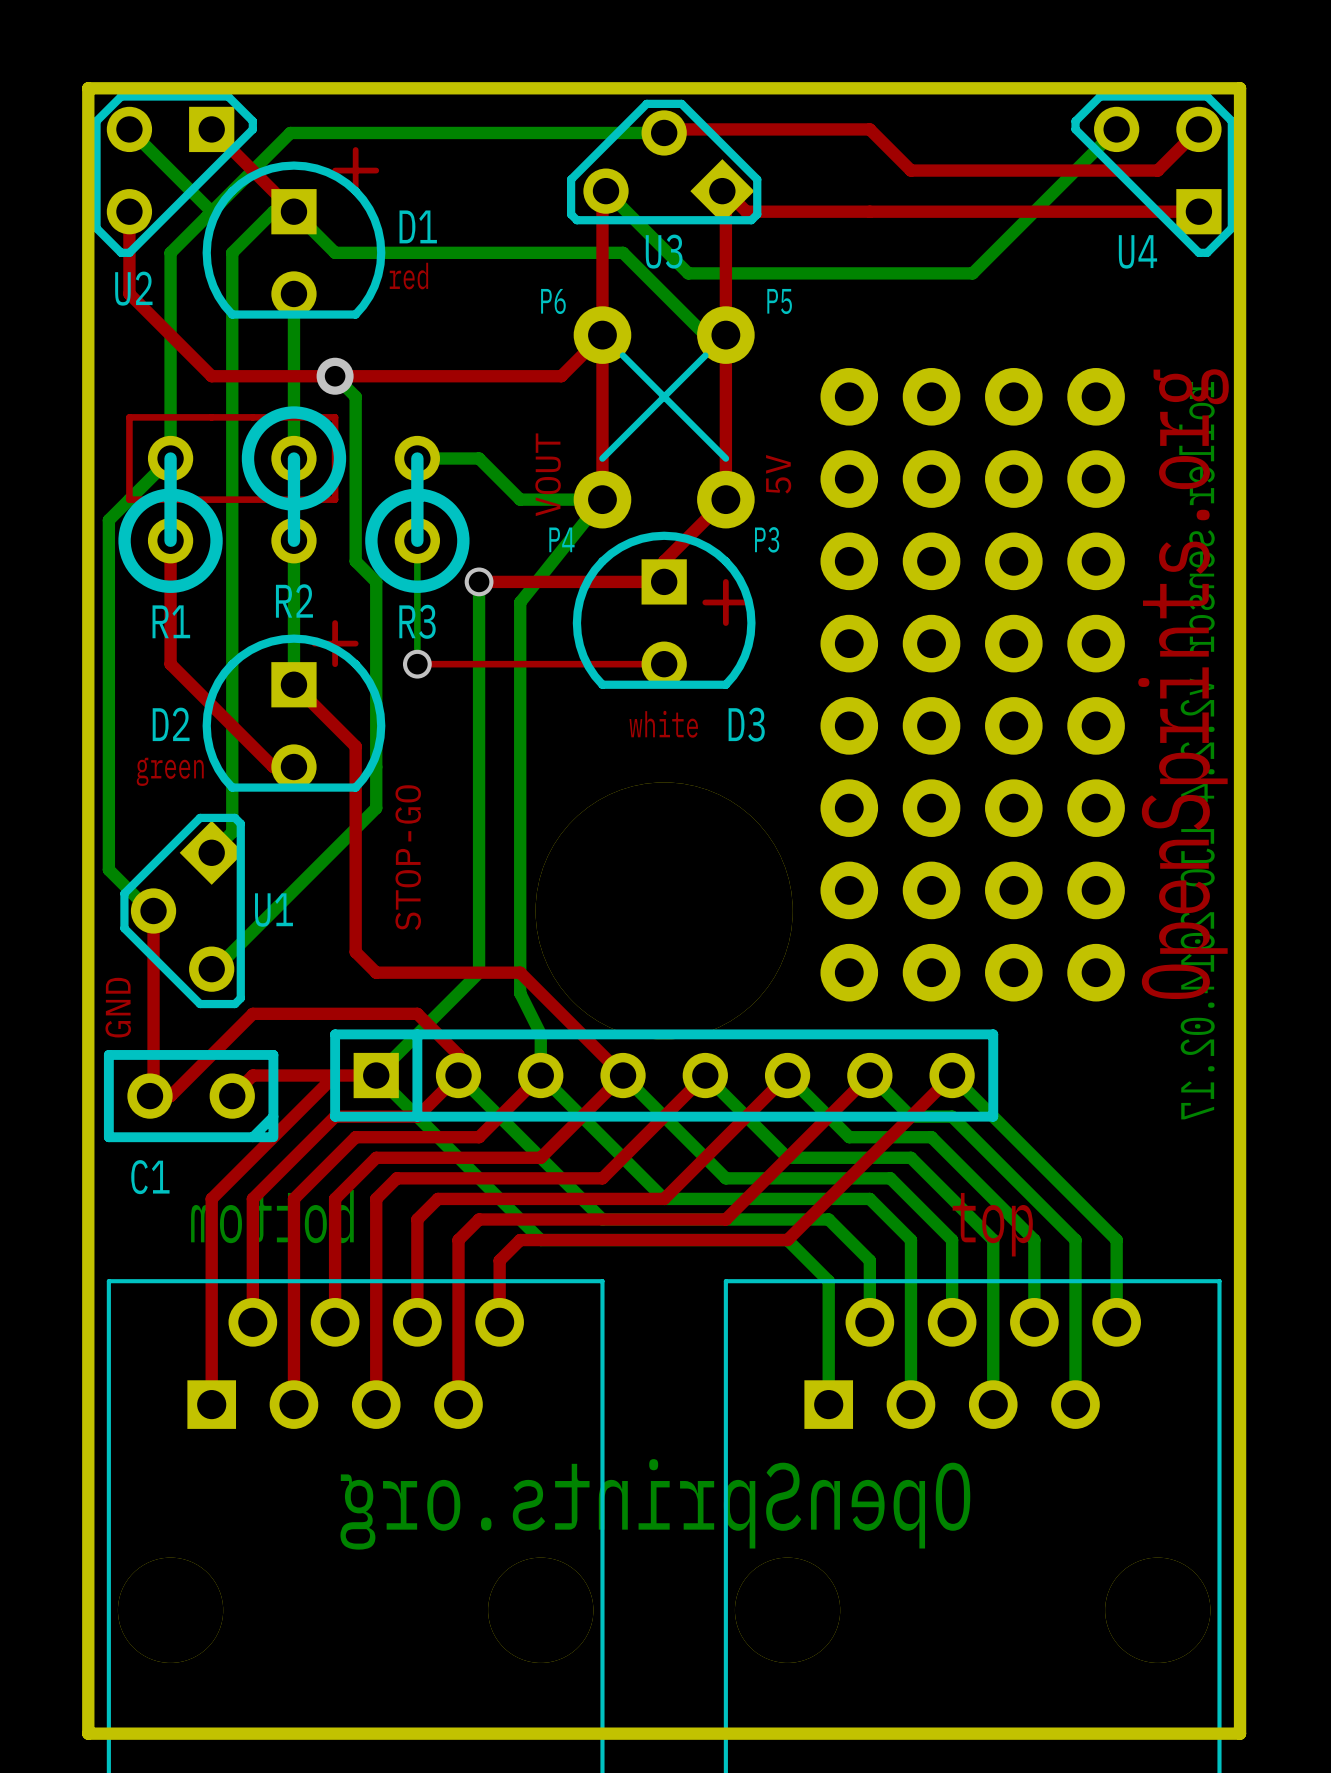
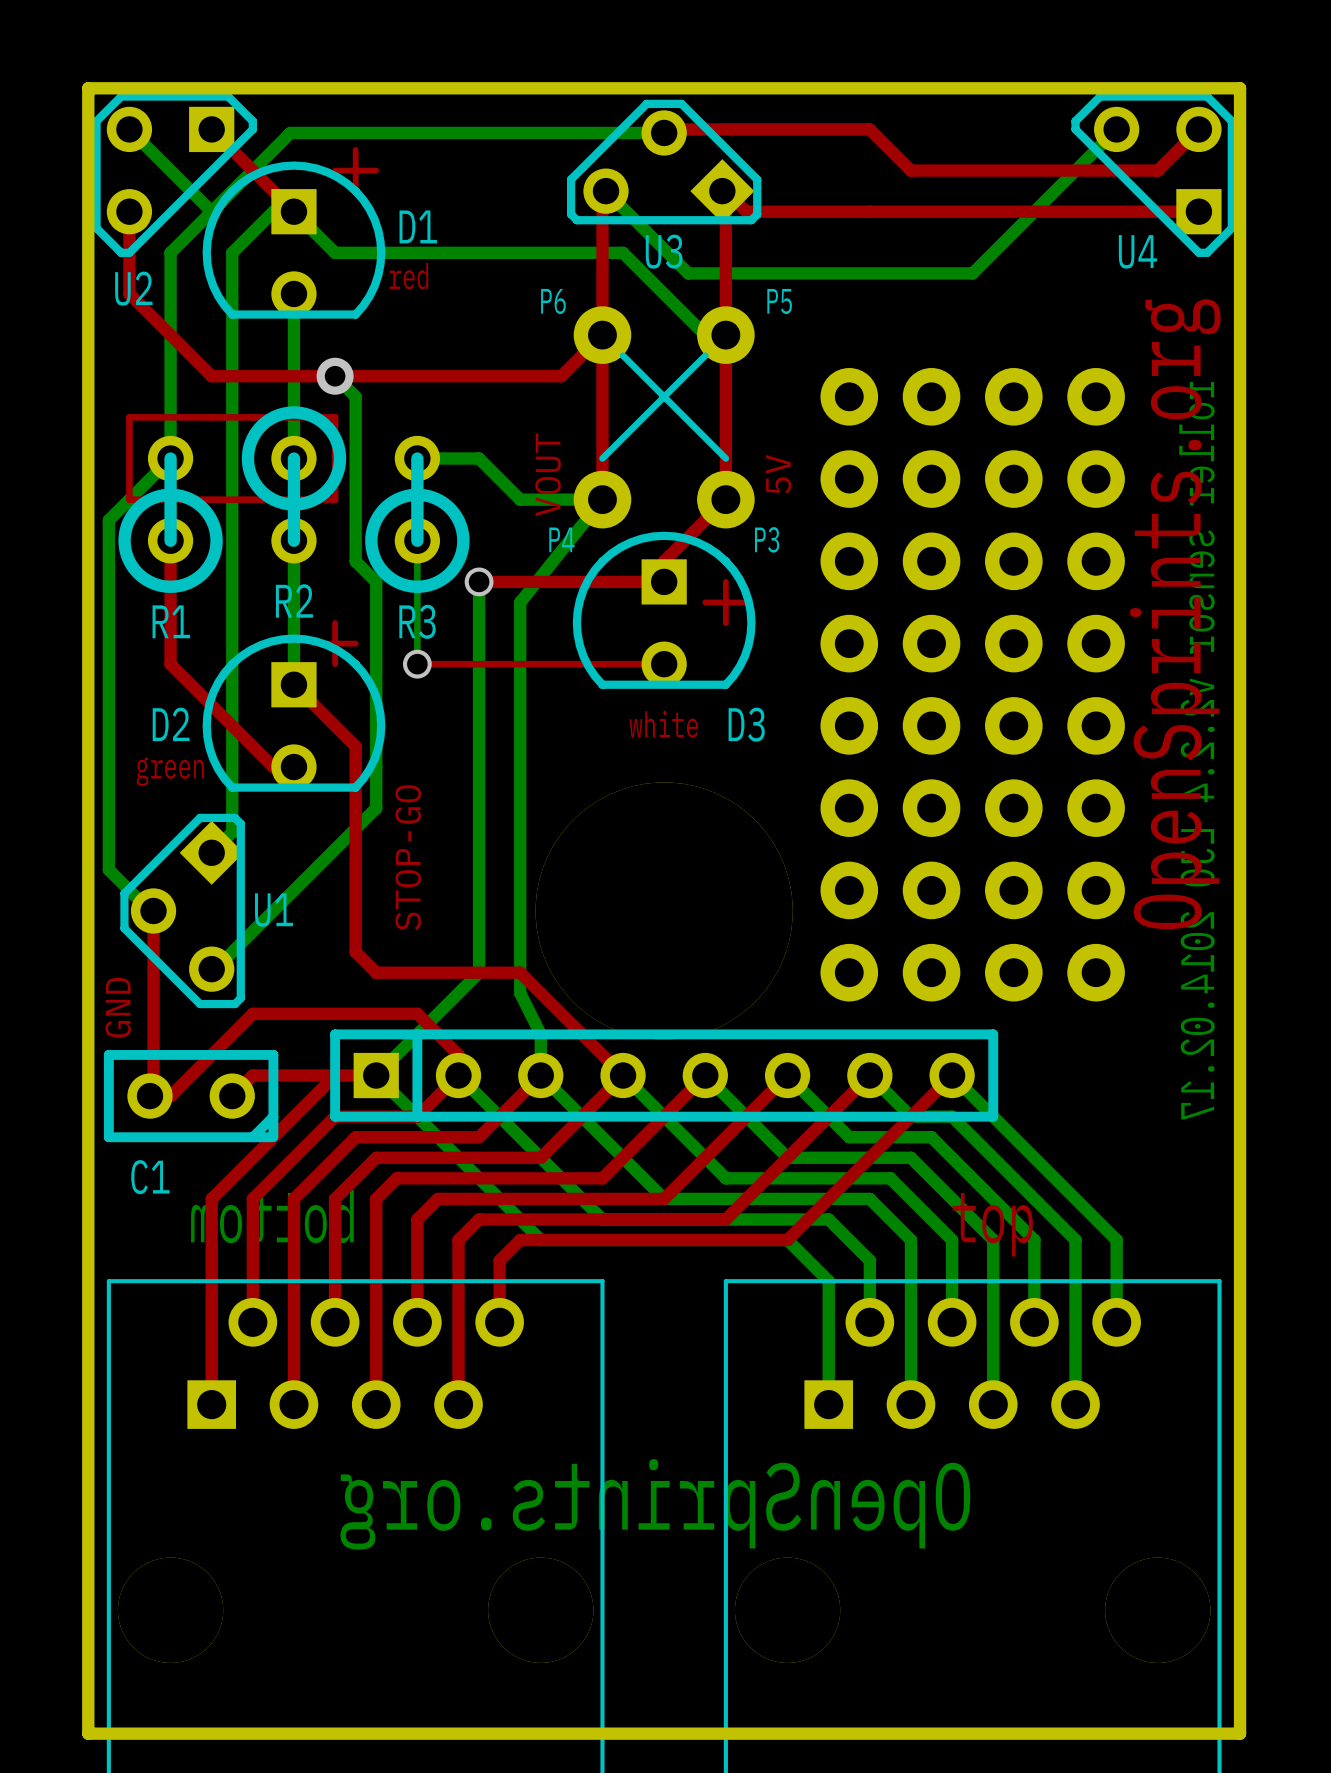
text position: OpenSprints.org (1183, 684) -> OpenSprints.org (1175, 614)

